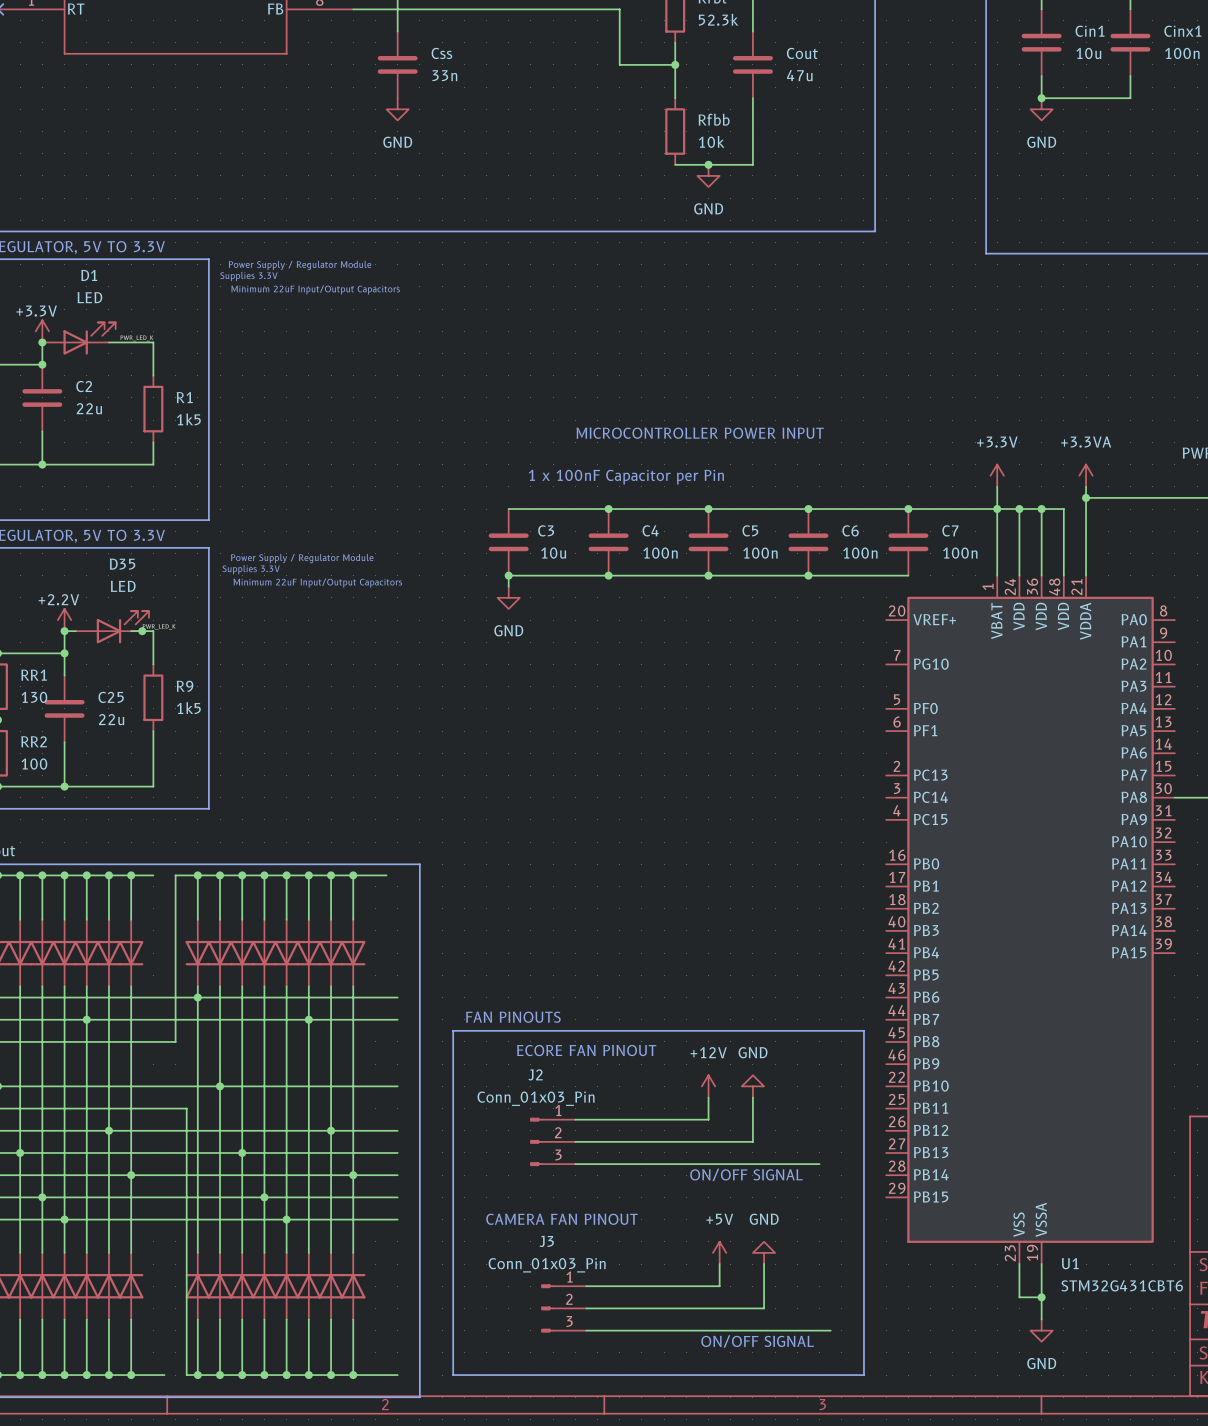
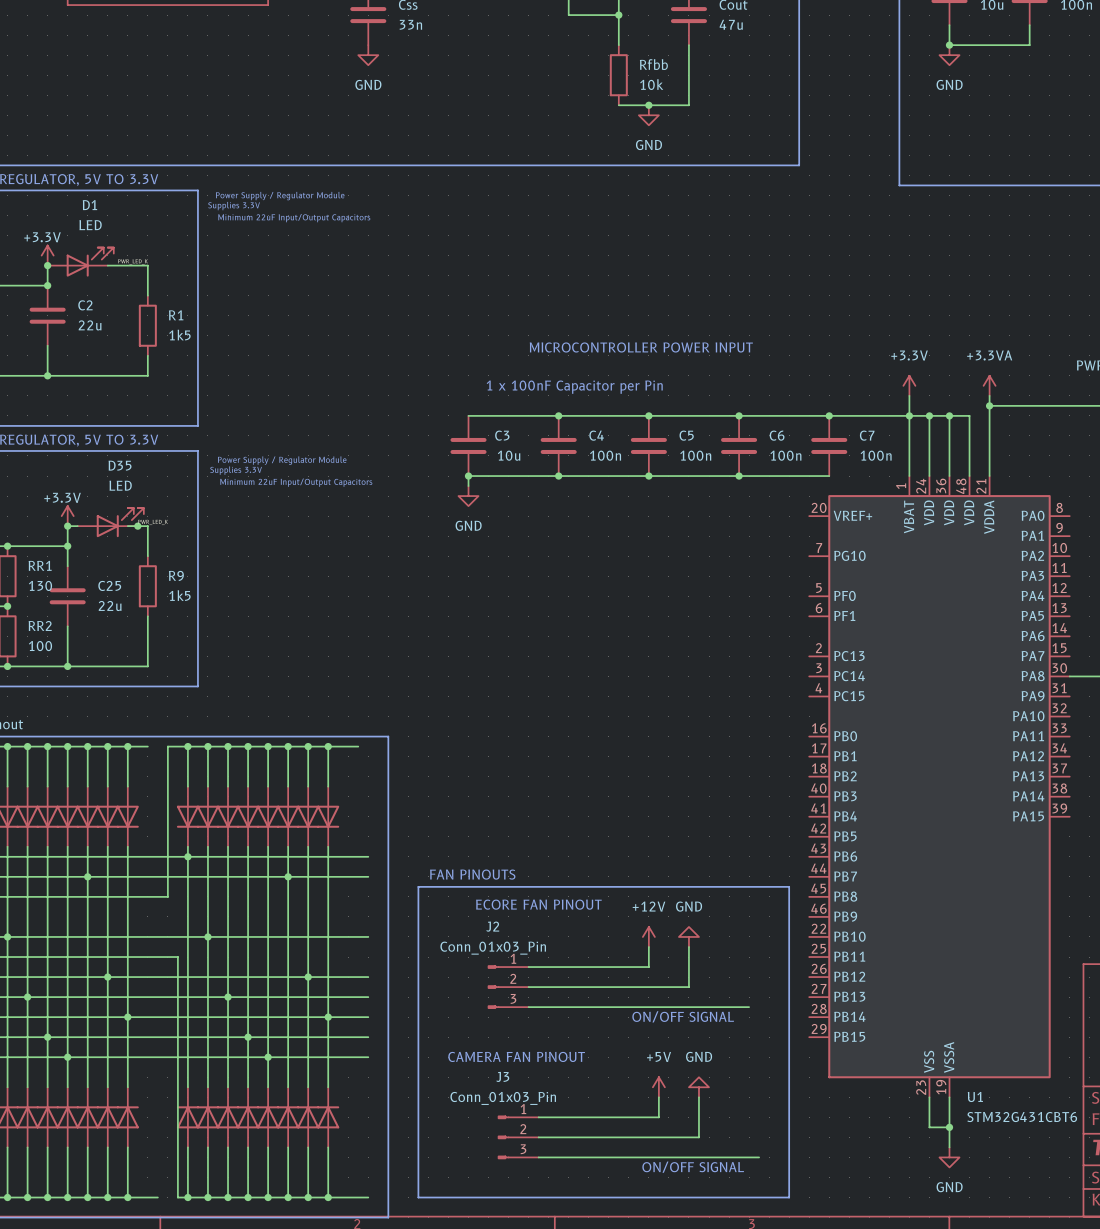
power symbol: +2.2V (64, 620) -> +3.3V (67, 516)

